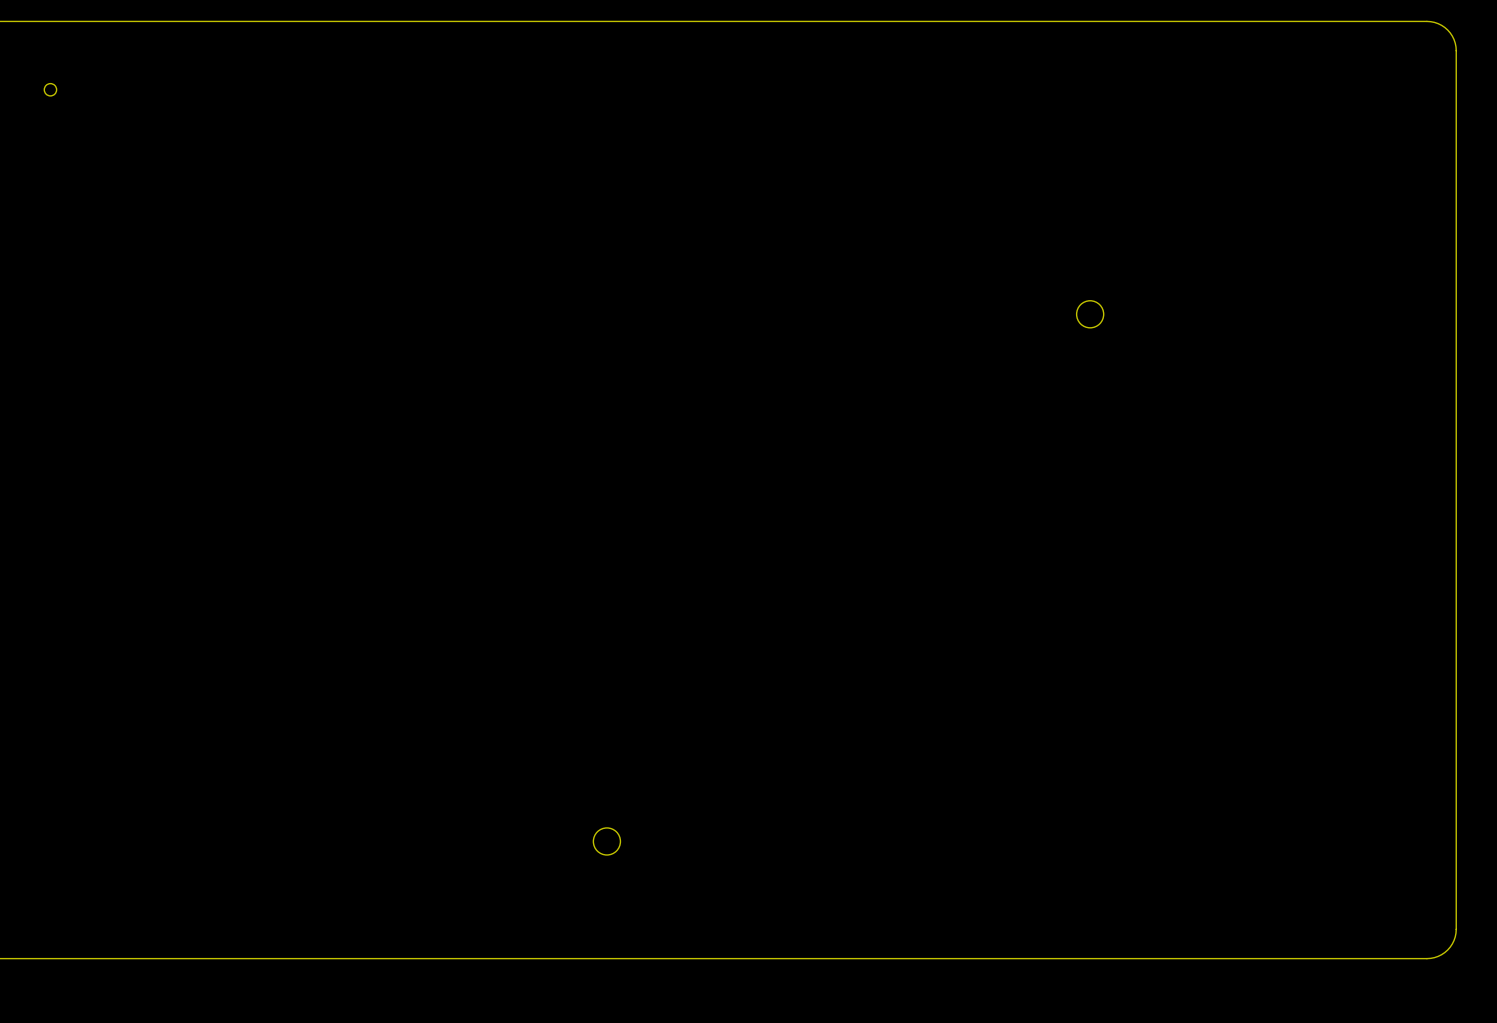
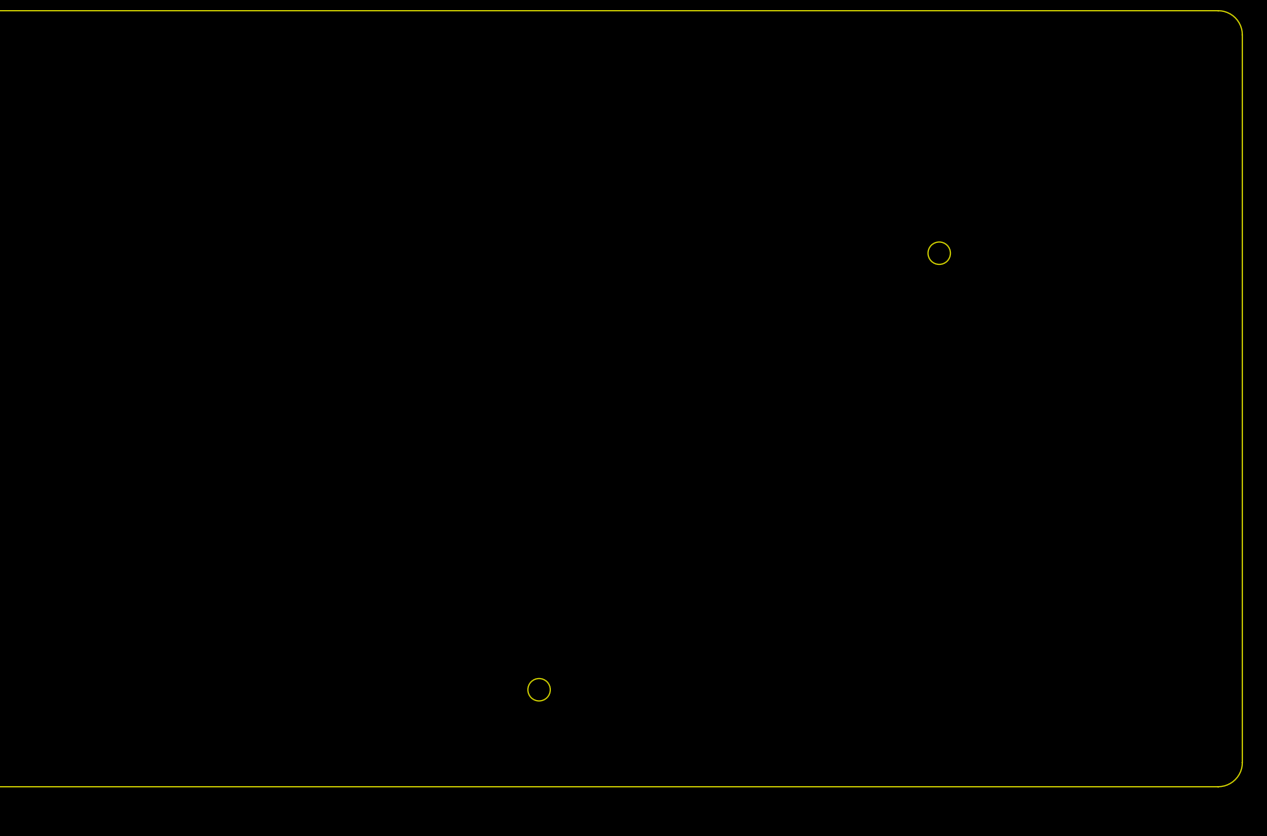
round board edge: [43, 83, 57, 97] -> none

